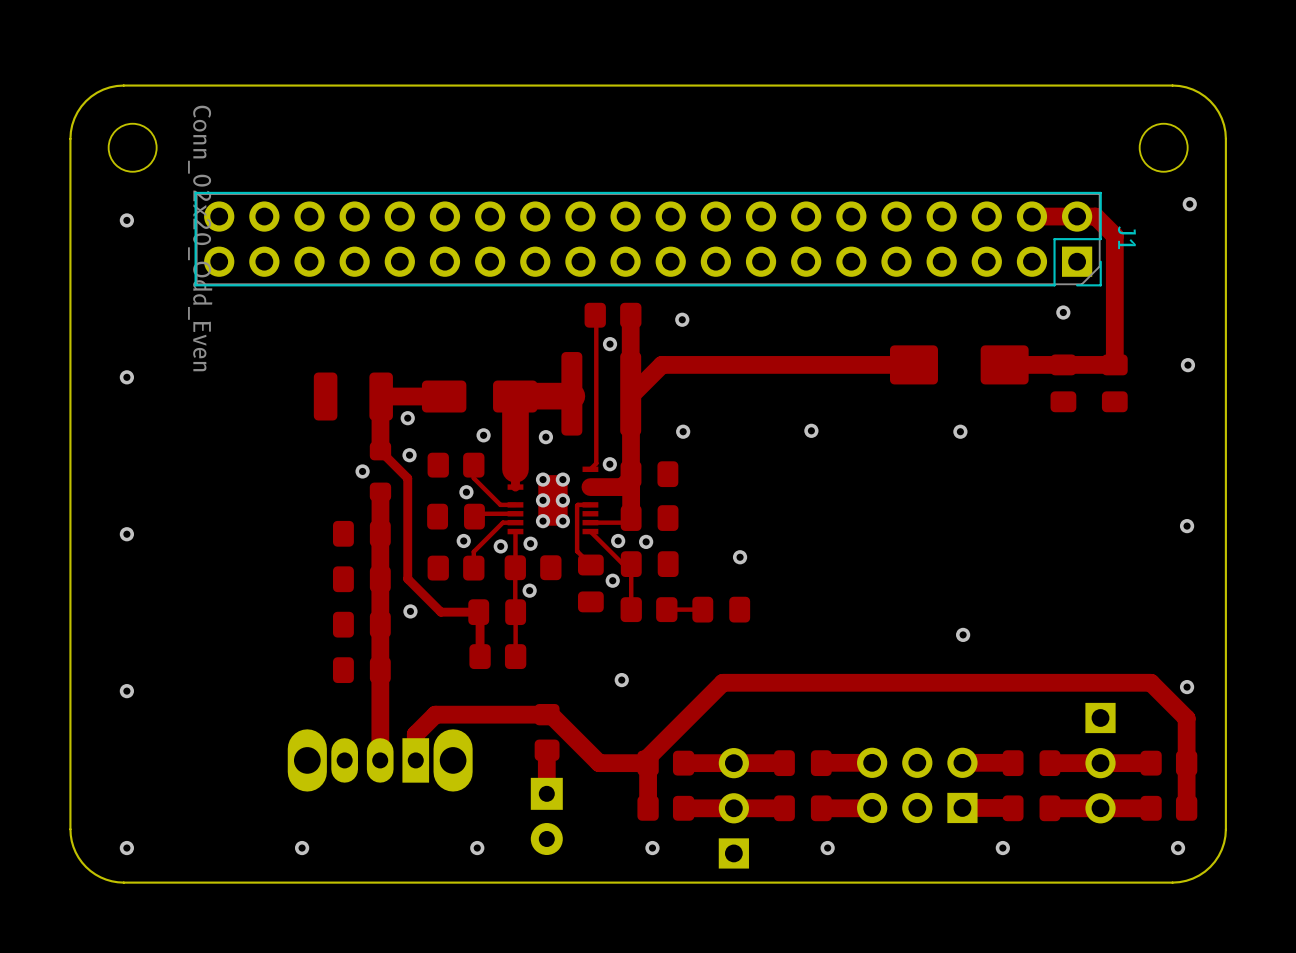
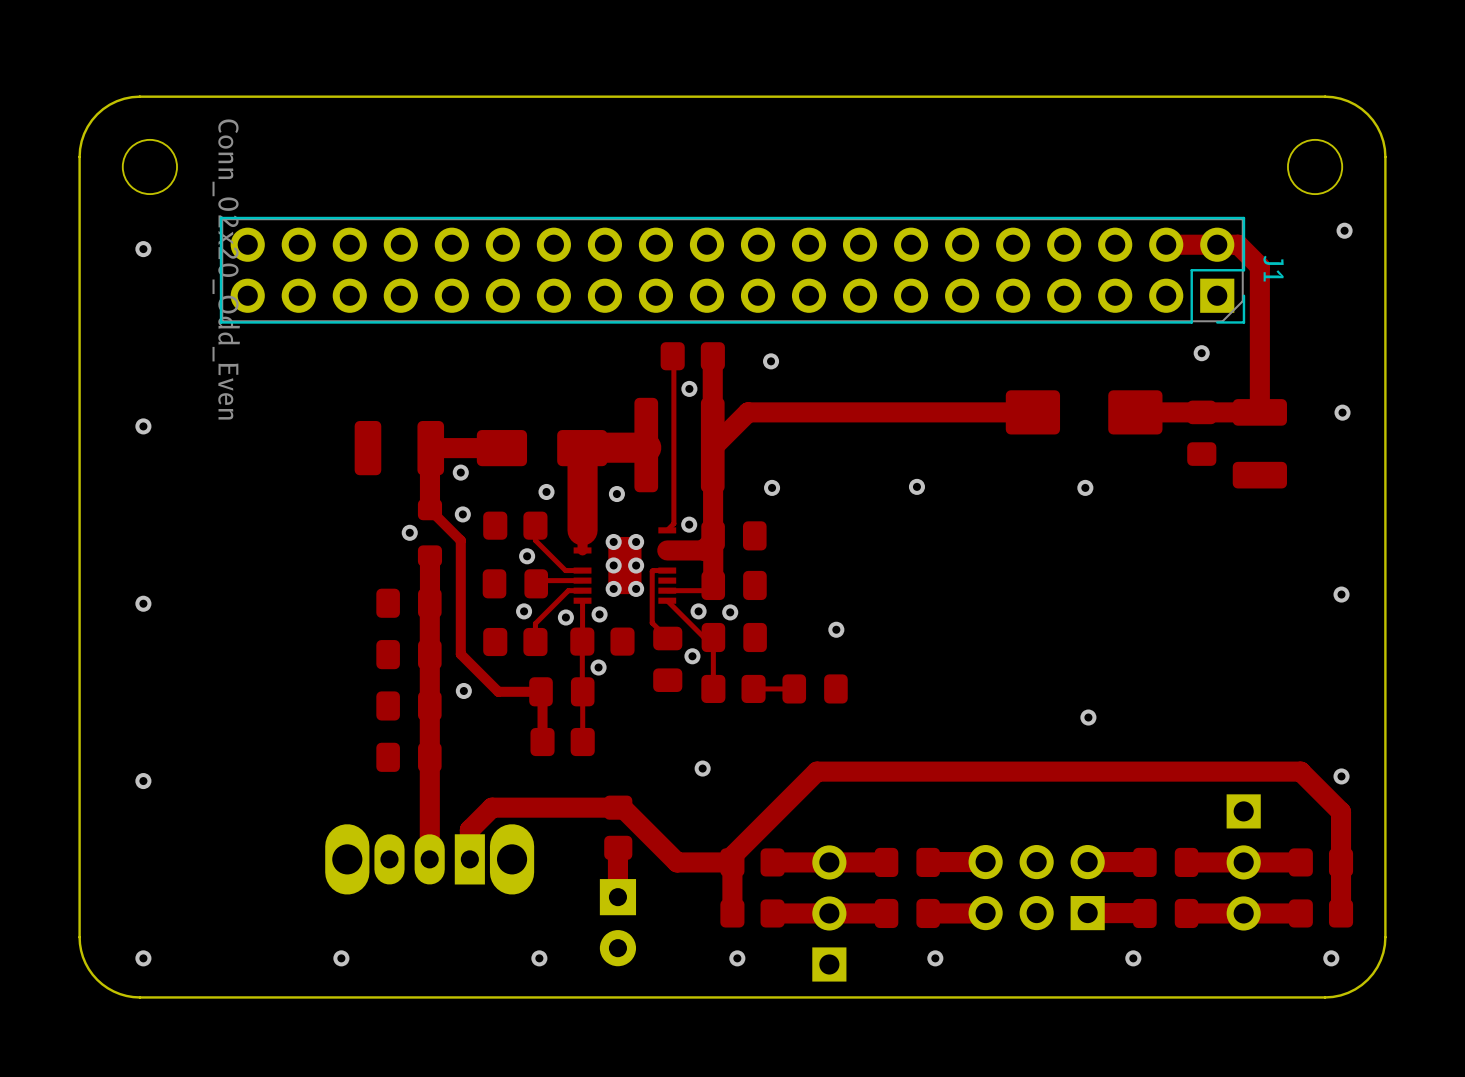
part footprint: [1101, 354, 1128, 413] -> [1232, 399, 1287, 489]

